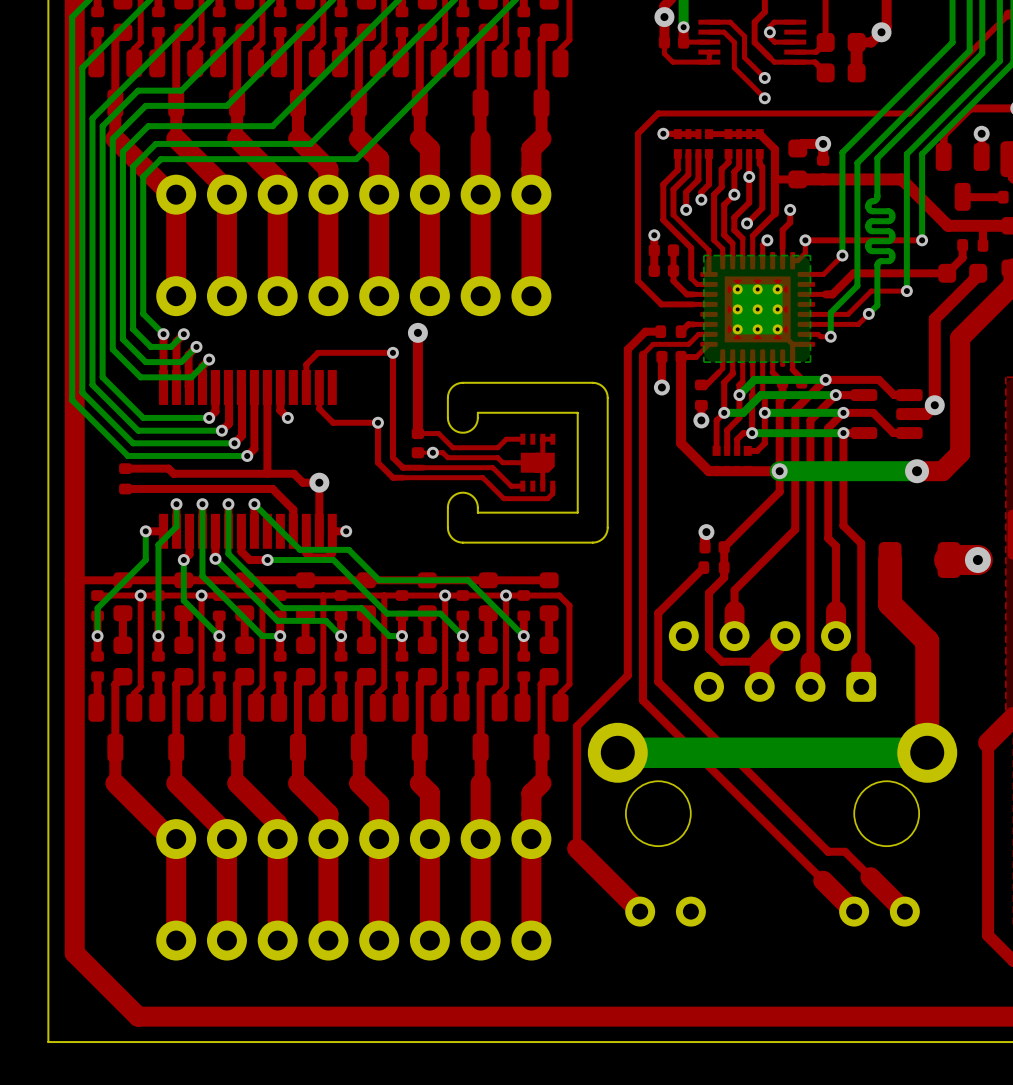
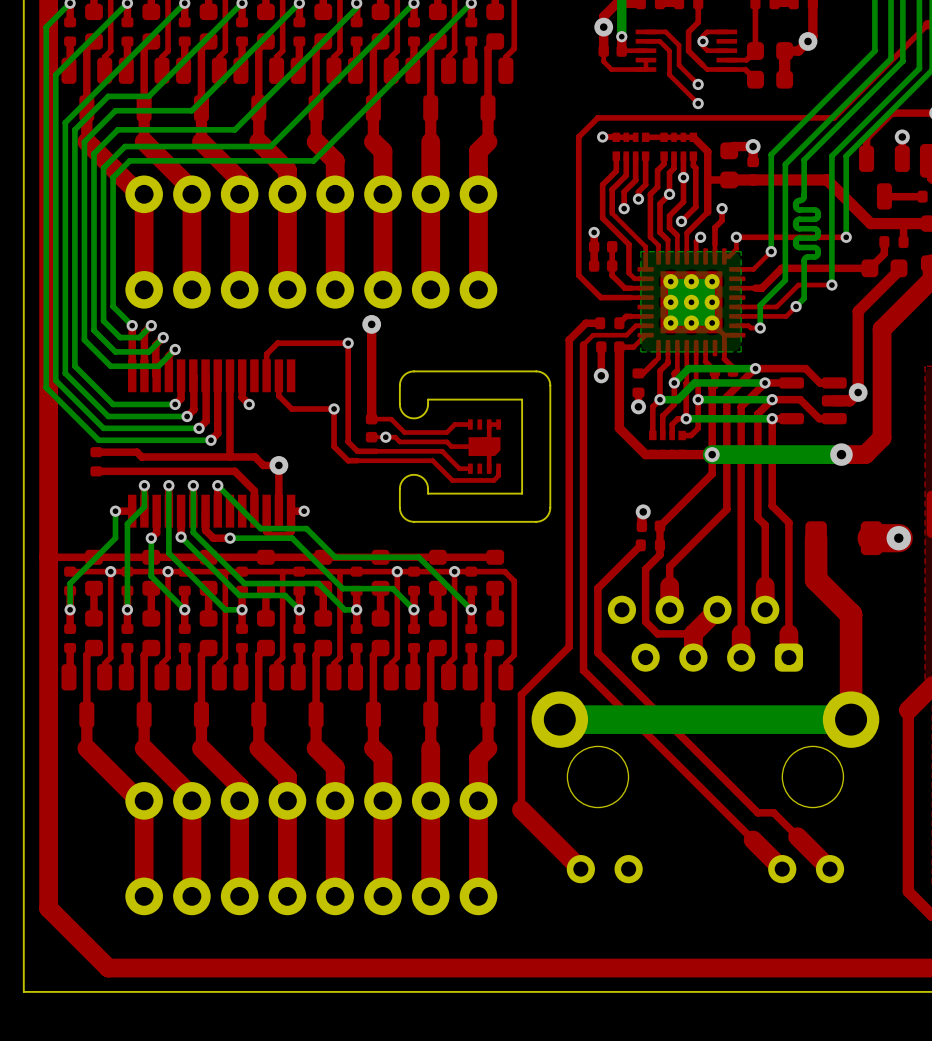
part footprint: [700, 251, 816, 367] -> [637, 248, 746, 357]

